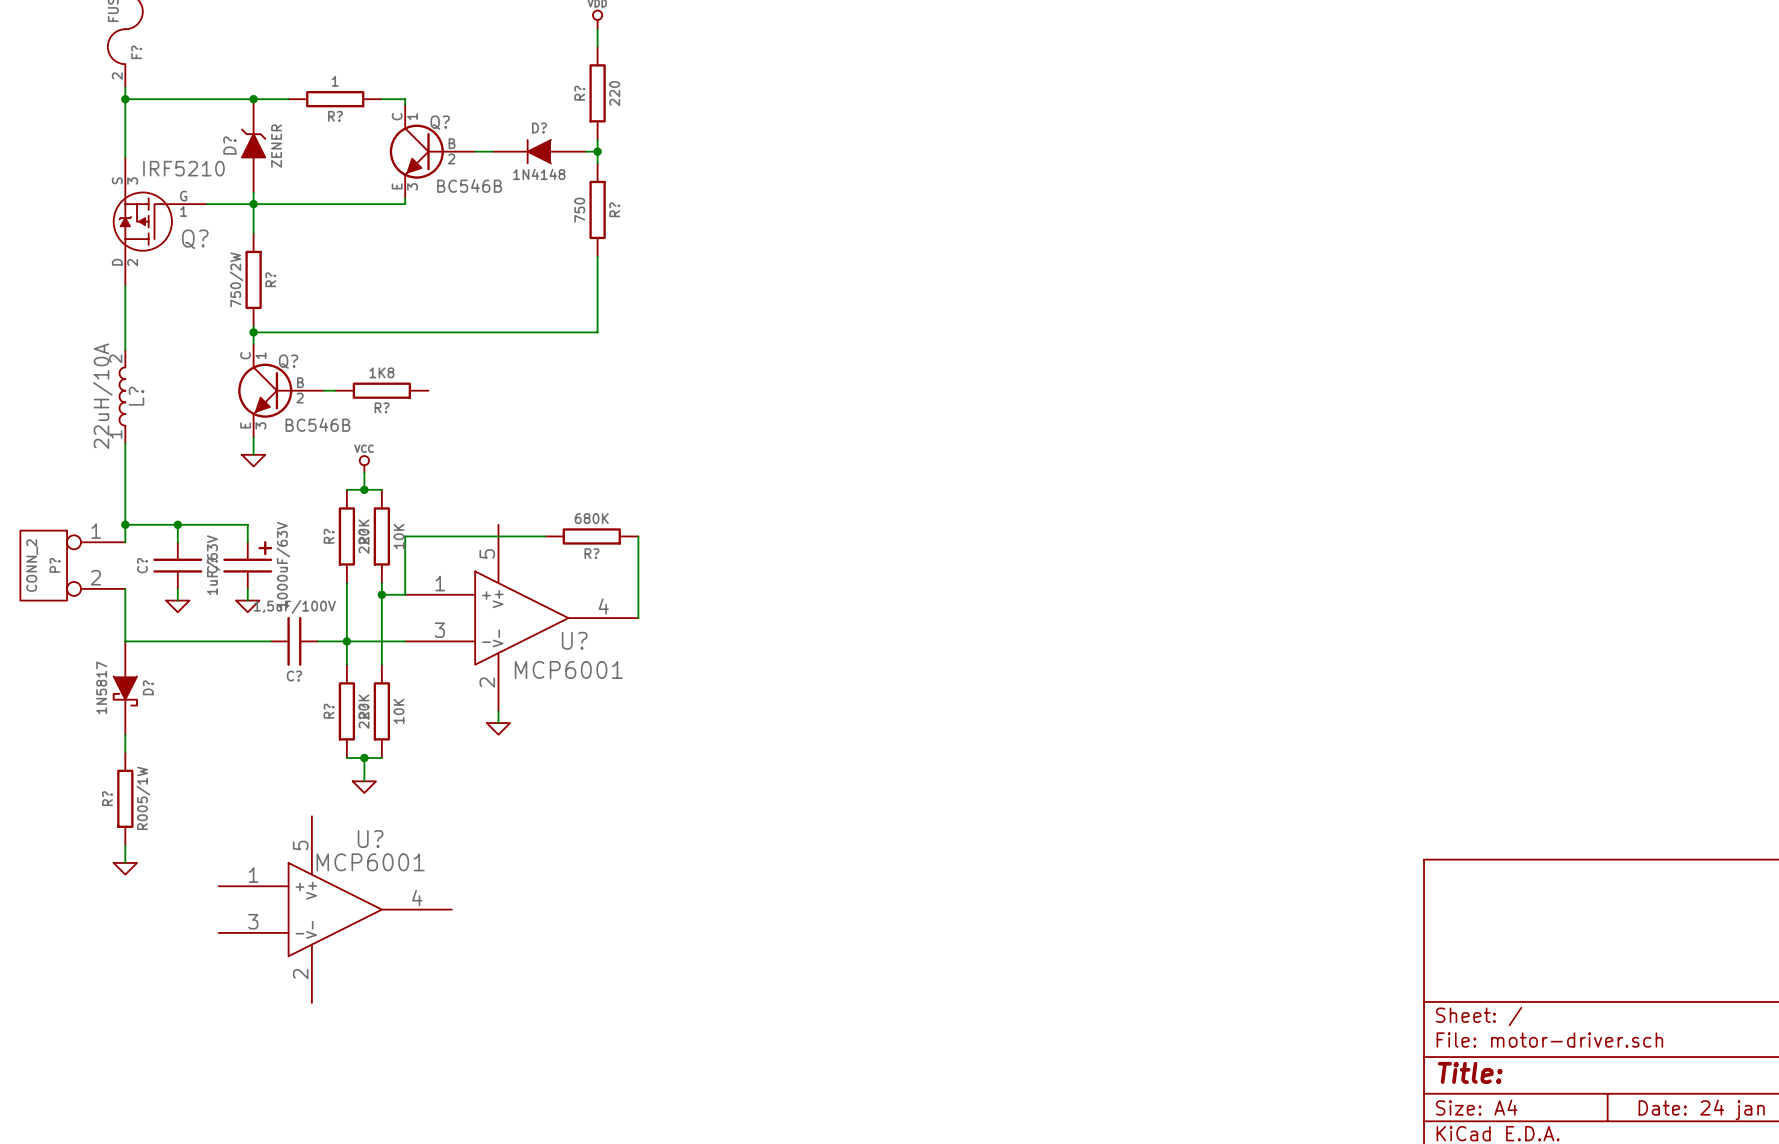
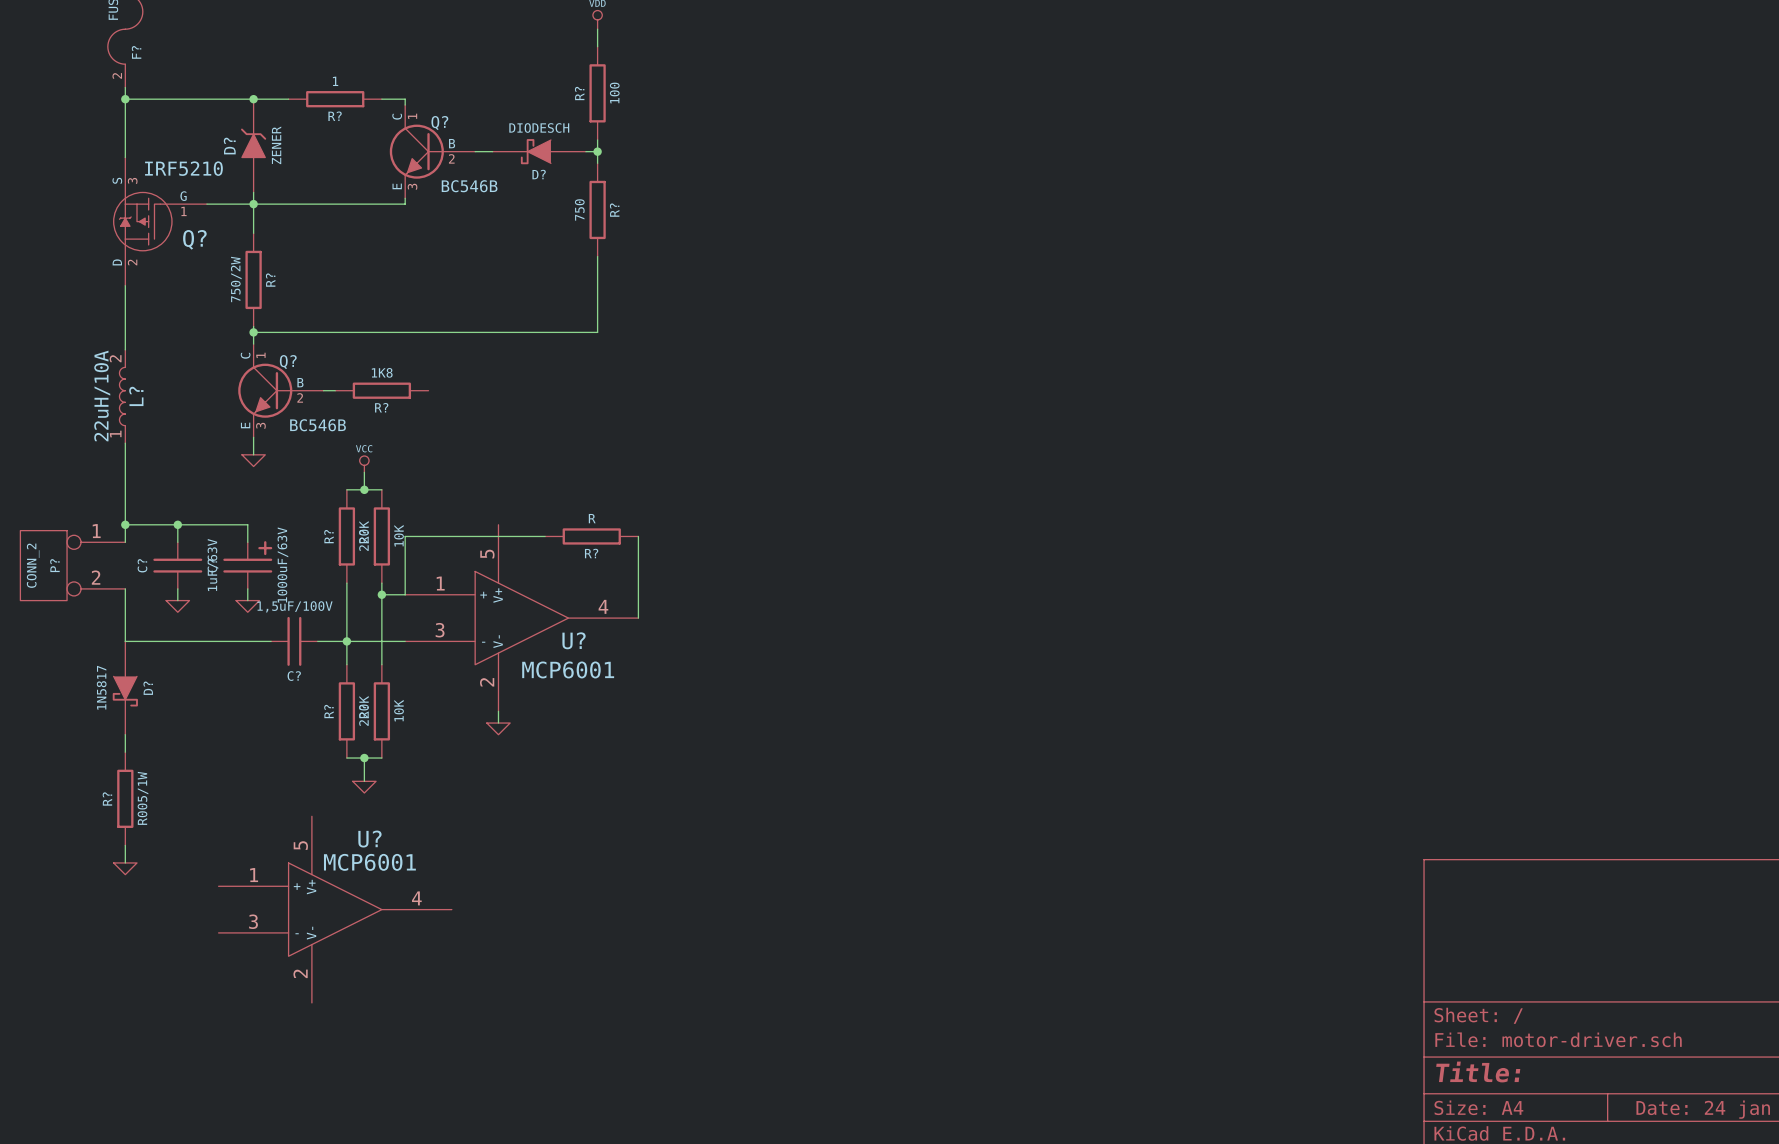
R? value: 220 (614, 93) -> 100 (614, 93)
D? name position: D? (539, 127) -> D? (539, 174)
D? symbol: [492, 139, 586, 165] -> [492, 139, 586, 165]
D? value: 1N4148 (539, 174) -> DIODESCH (539, 127)
R? value: 680K (591, 518) -> R (592, 518)

